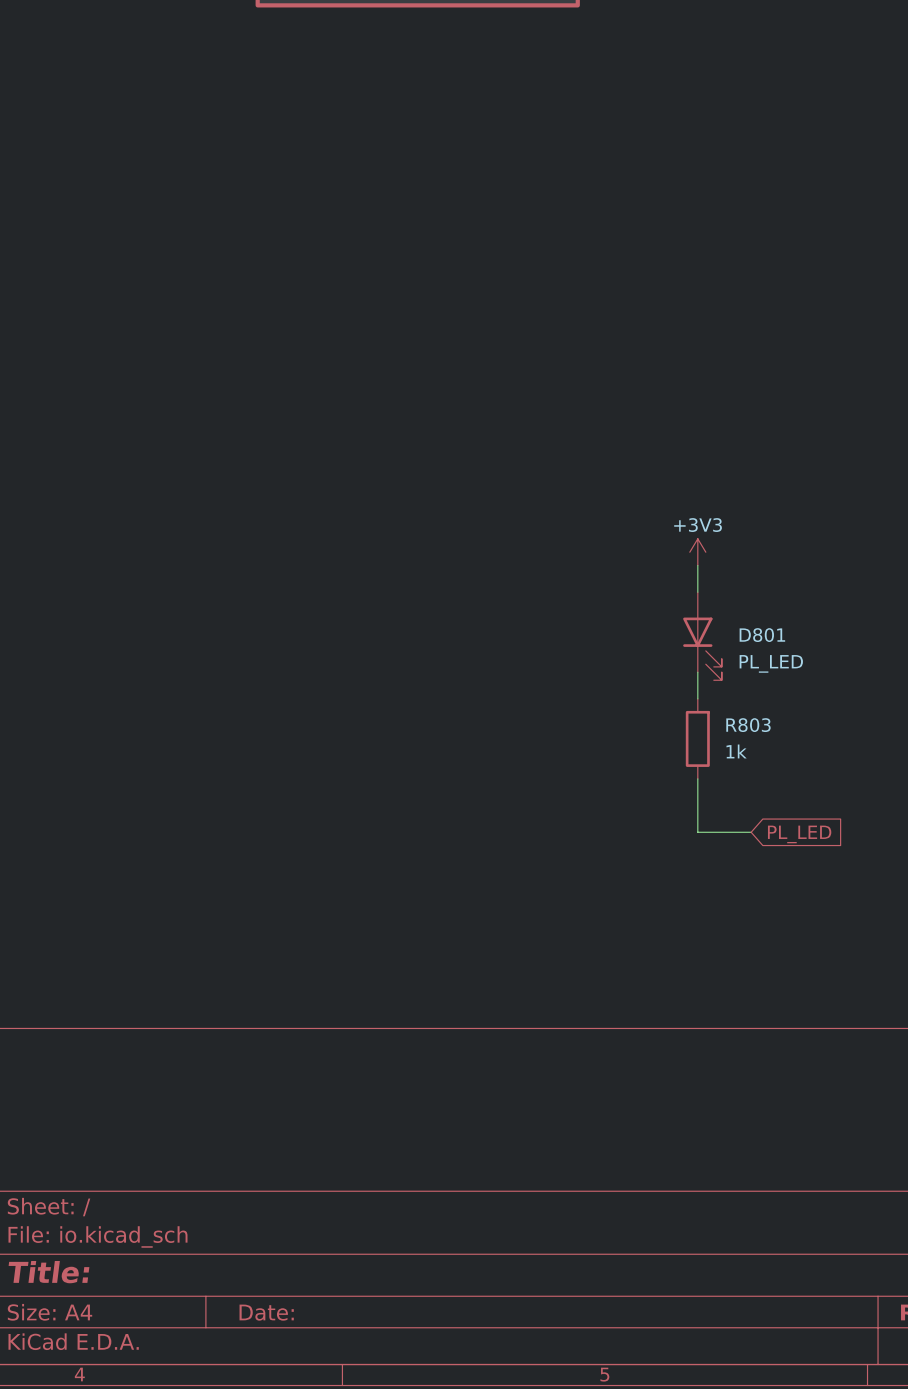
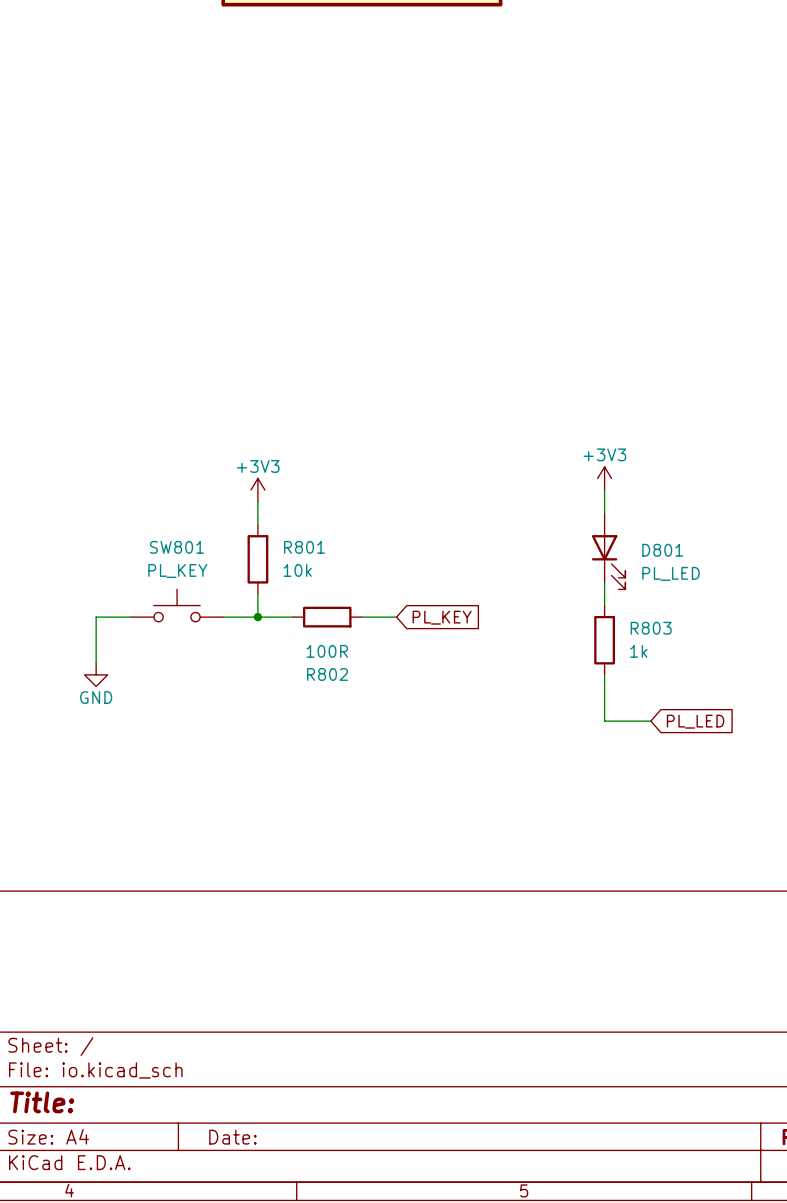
power symbol: none -> +3V3 (257, 490)
wire: none -> (257, 501) (257, 524)
R801: none -> 10k (257, 559)
wire: none -> (257, 594) (257, 617)
SW801: none -> PL_KEY (177, 605)
wire: none -> (130, 617) (96, 617) (96, 663)
wire: none -> (223, 617) (292, 617)
junction: none -> (257, 617)
R802: none -> 100R (327, 617)
wire: none -> (361, 617) (396, 617)
global label: none -> PL_KEY (442, 617)
power symbol: none -> GND (96, 674)

